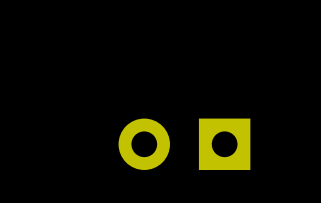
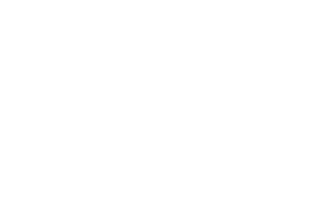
part: (184, 144) -> none

